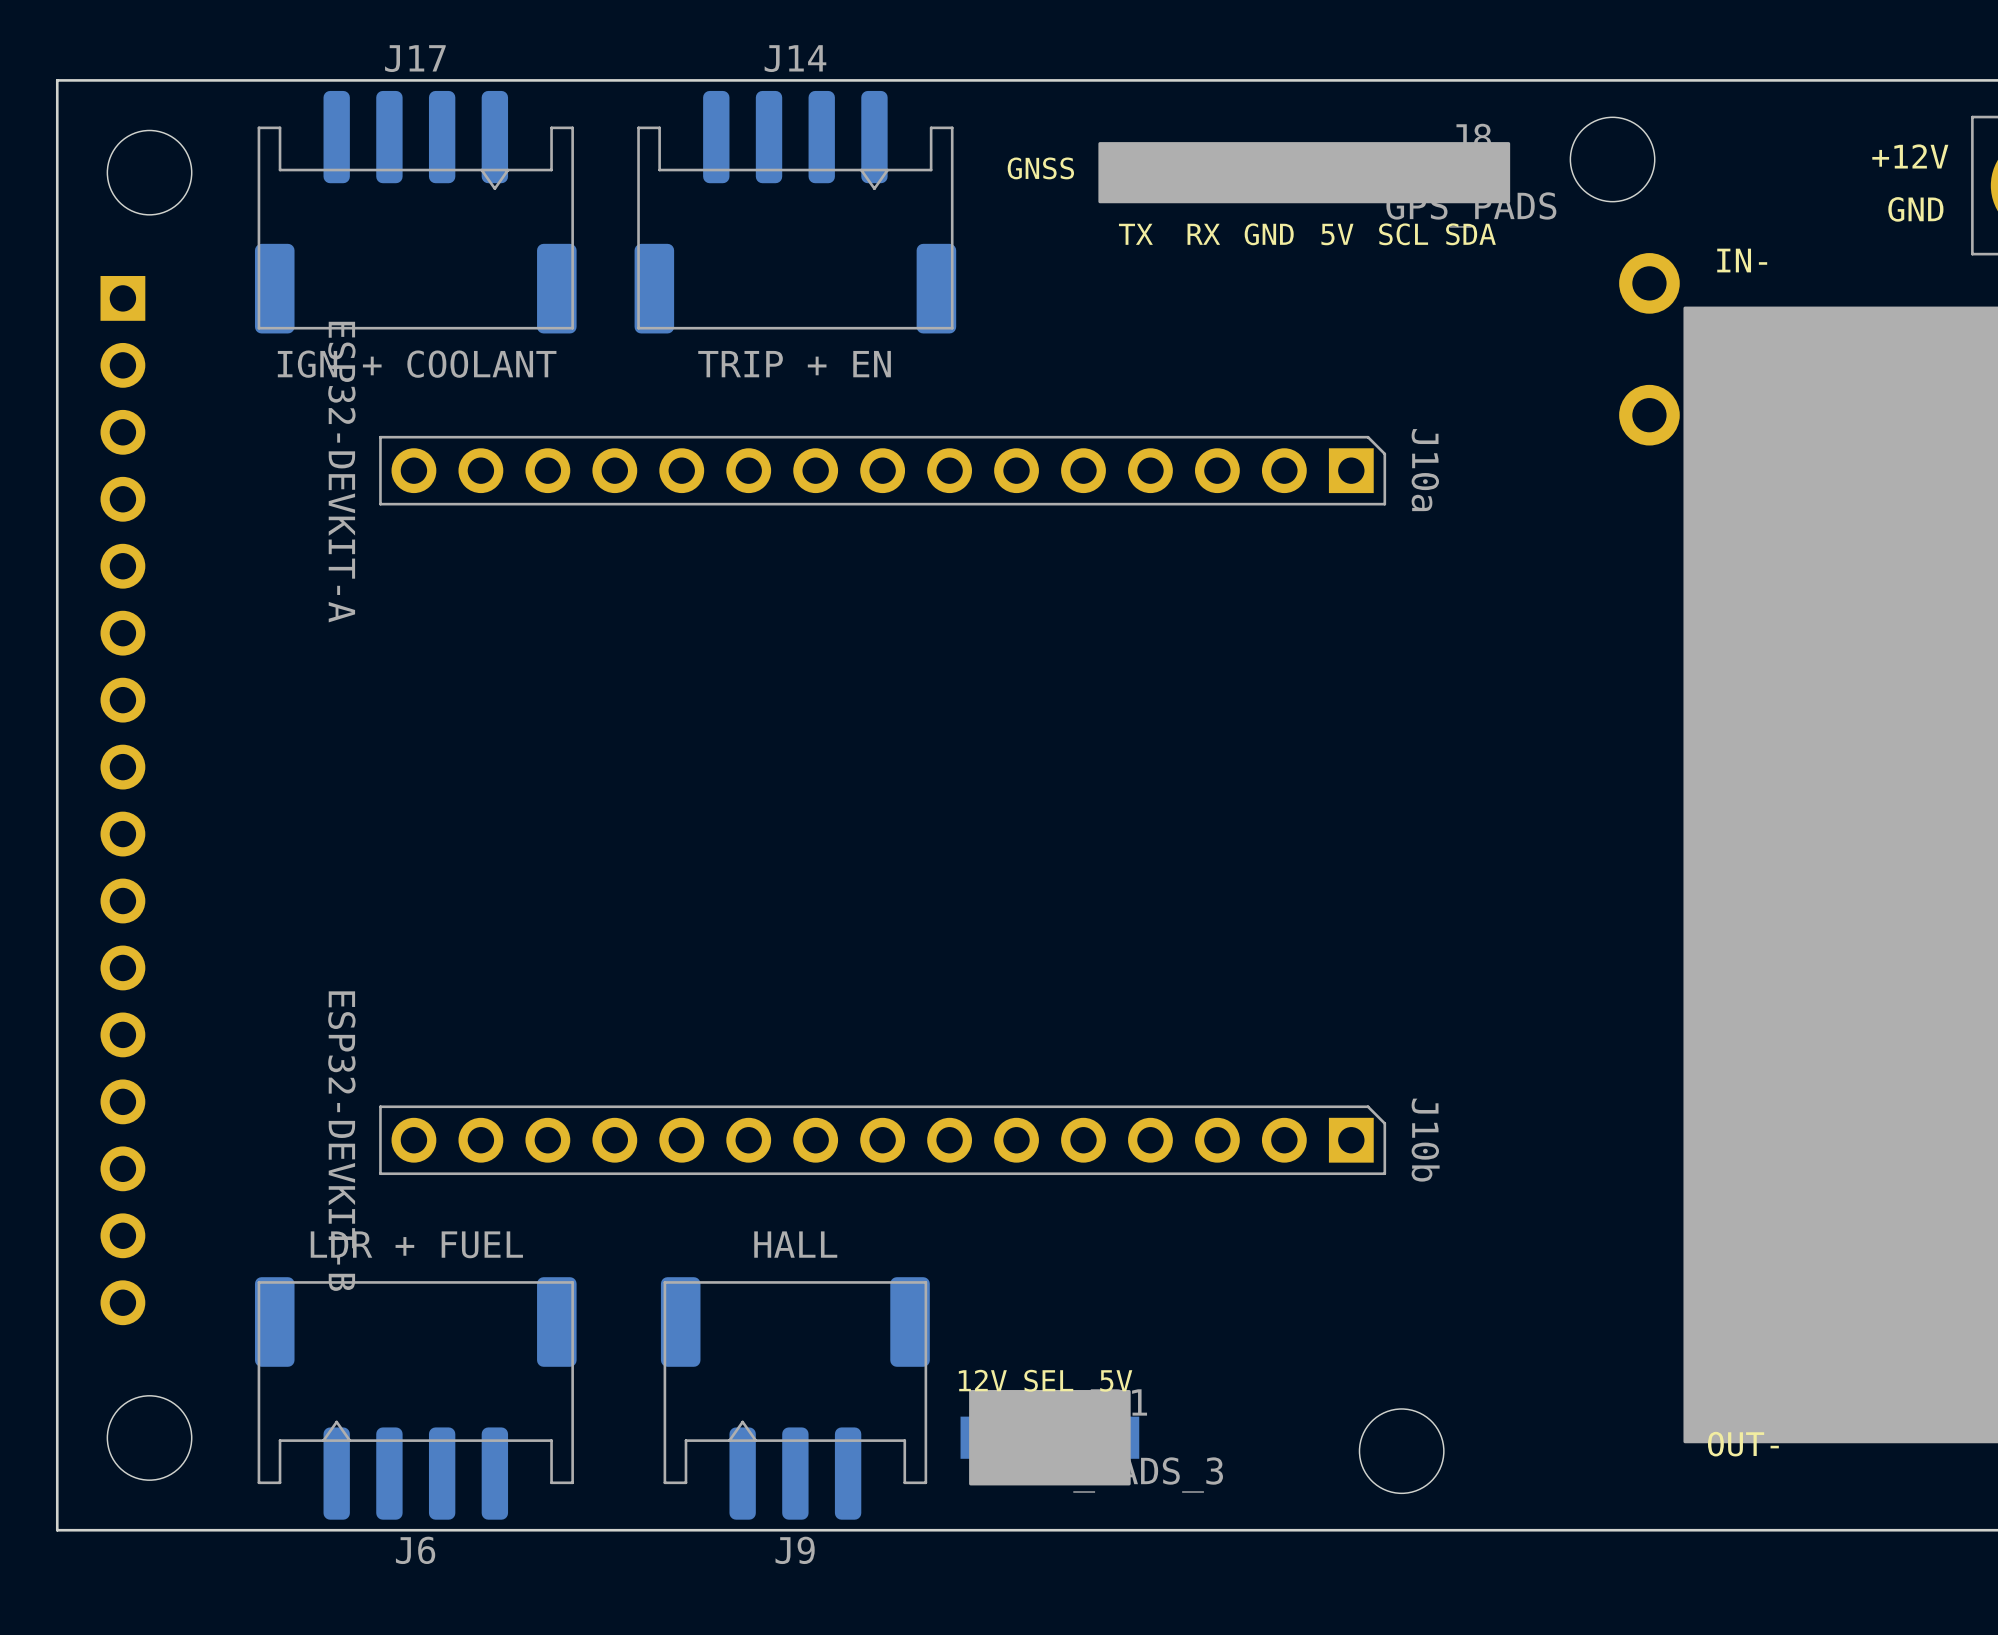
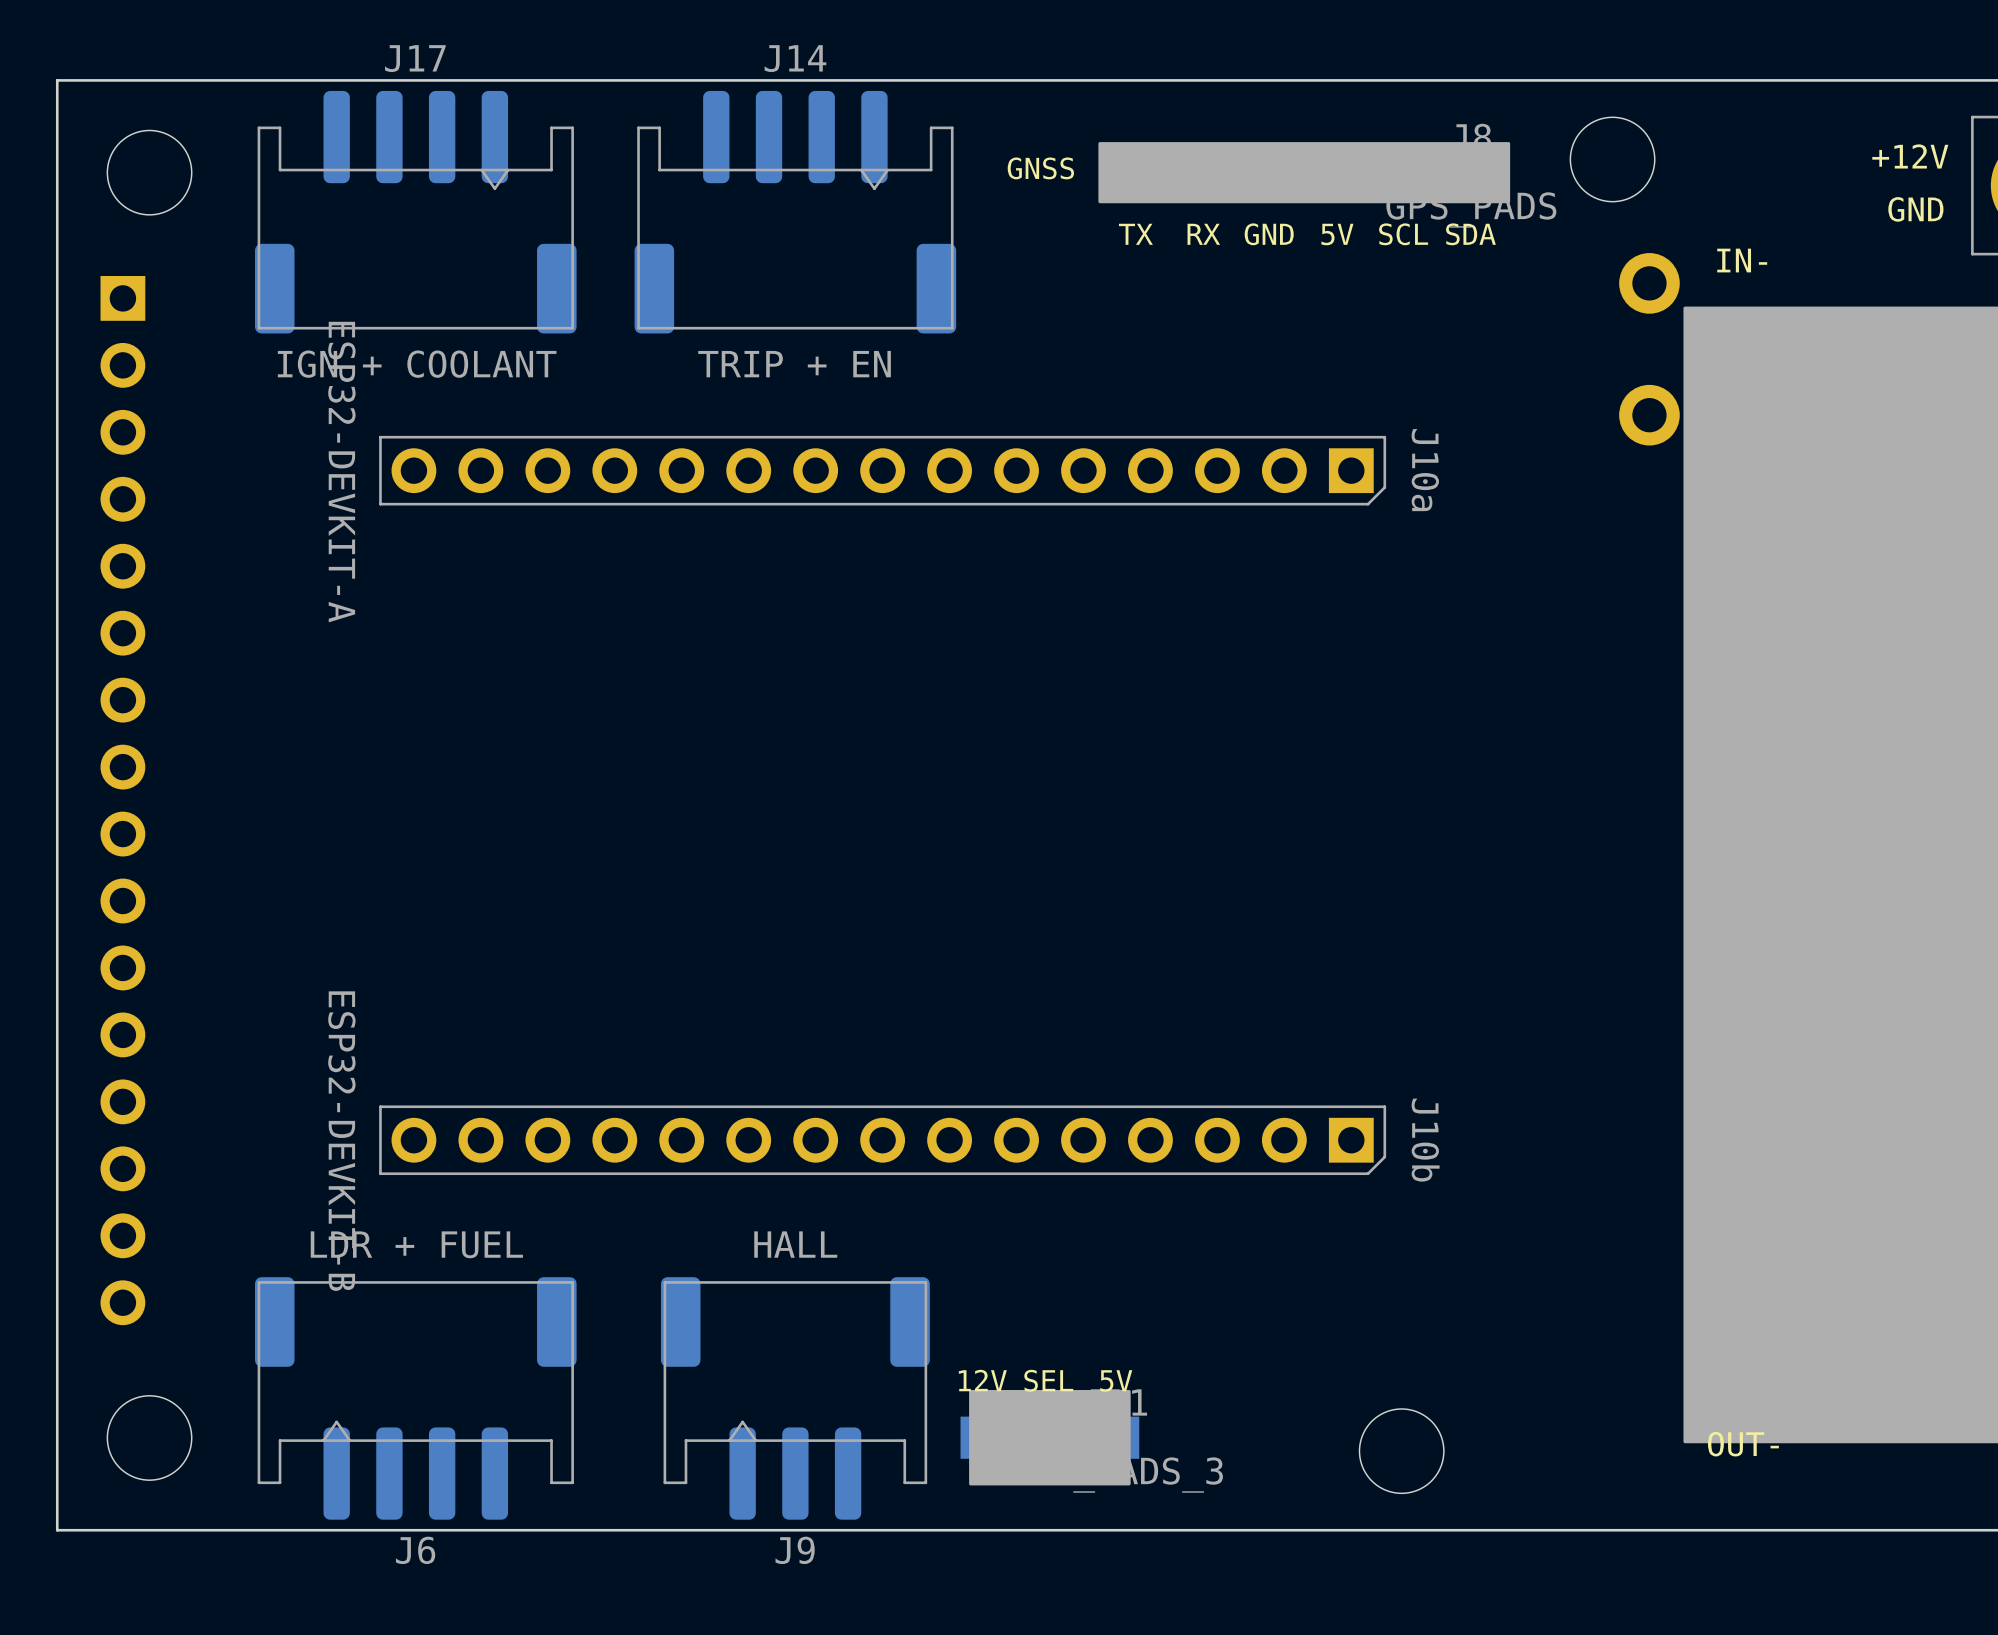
J10a footprint: [379, 435, 1387, 506] -> [379, 435, 1387, 506]
J10b footprint: [379, 1105, 1387, 1176] -> [379, 1105, 1387, 1176]

